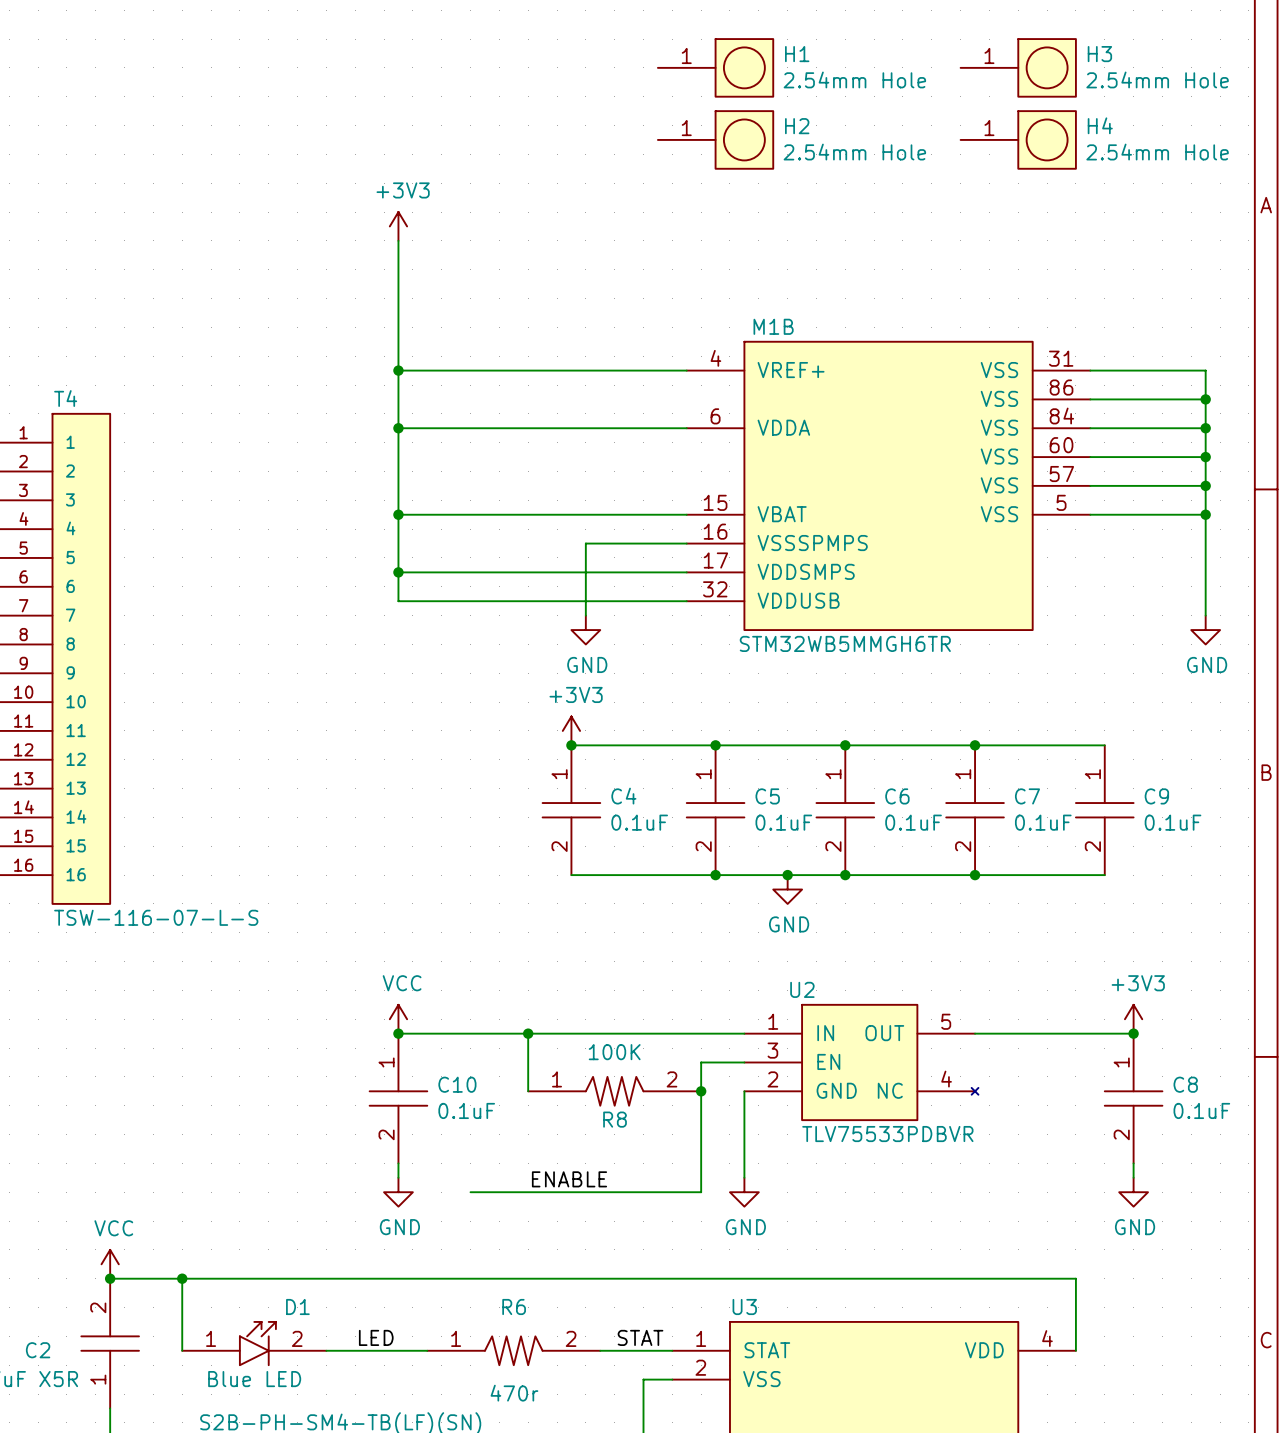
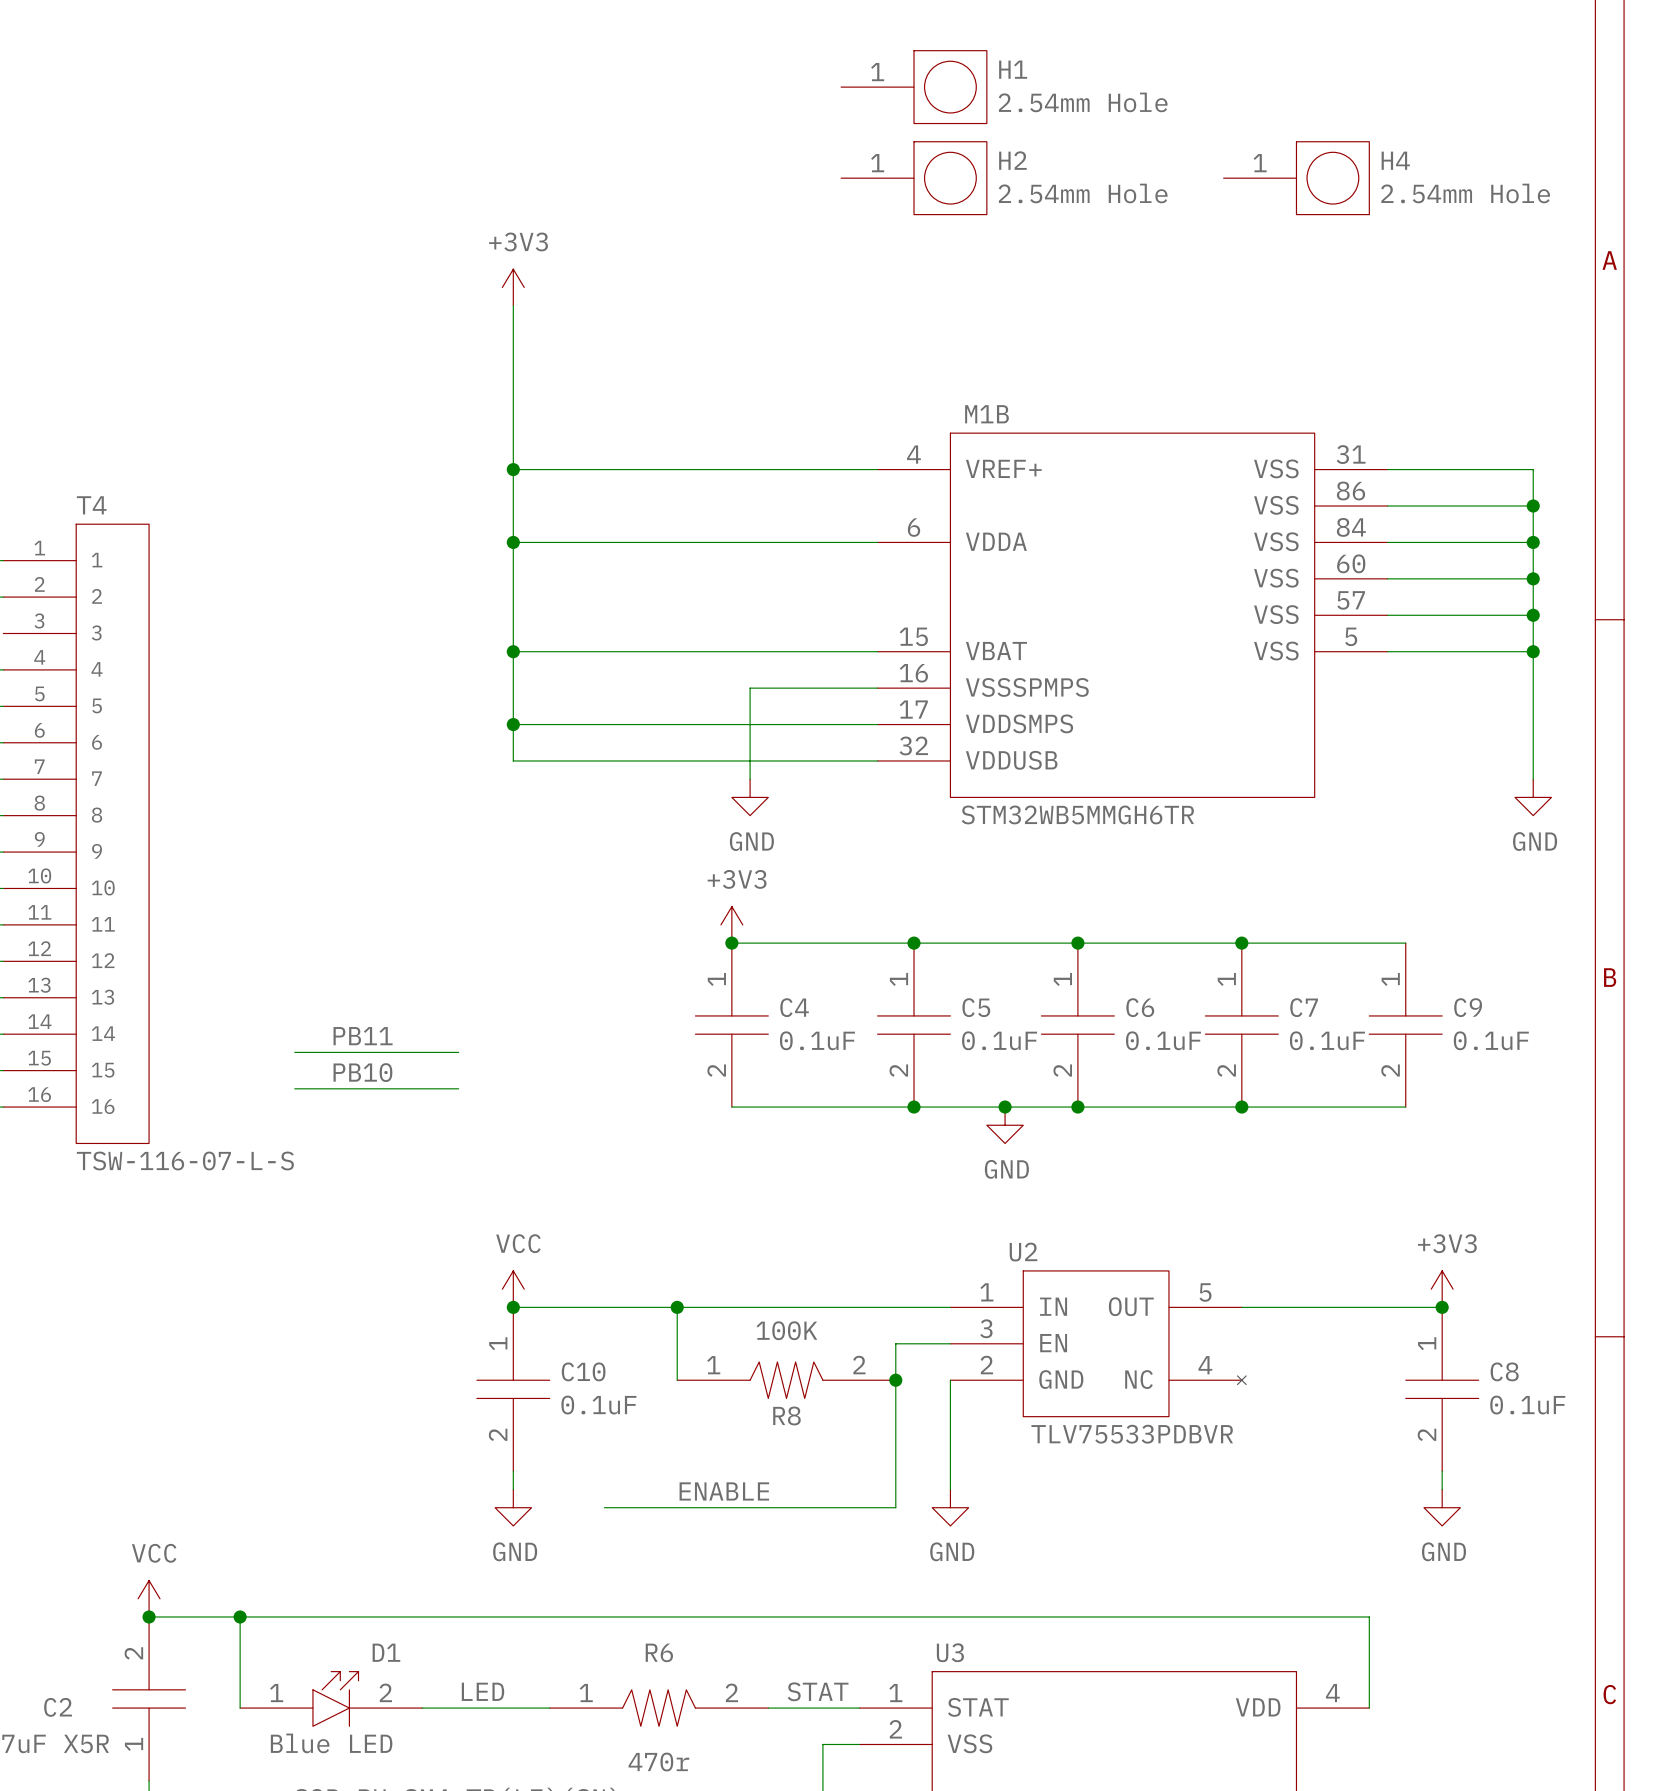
H3: (1018, 67) -> none
label: none -> PB11 (363, 1036)
wire: none -> (294, 1052) (458, 1052)
label: none -> PB10 (362, 1072)
wire: none -> (294, 1088) (458, 1088)

